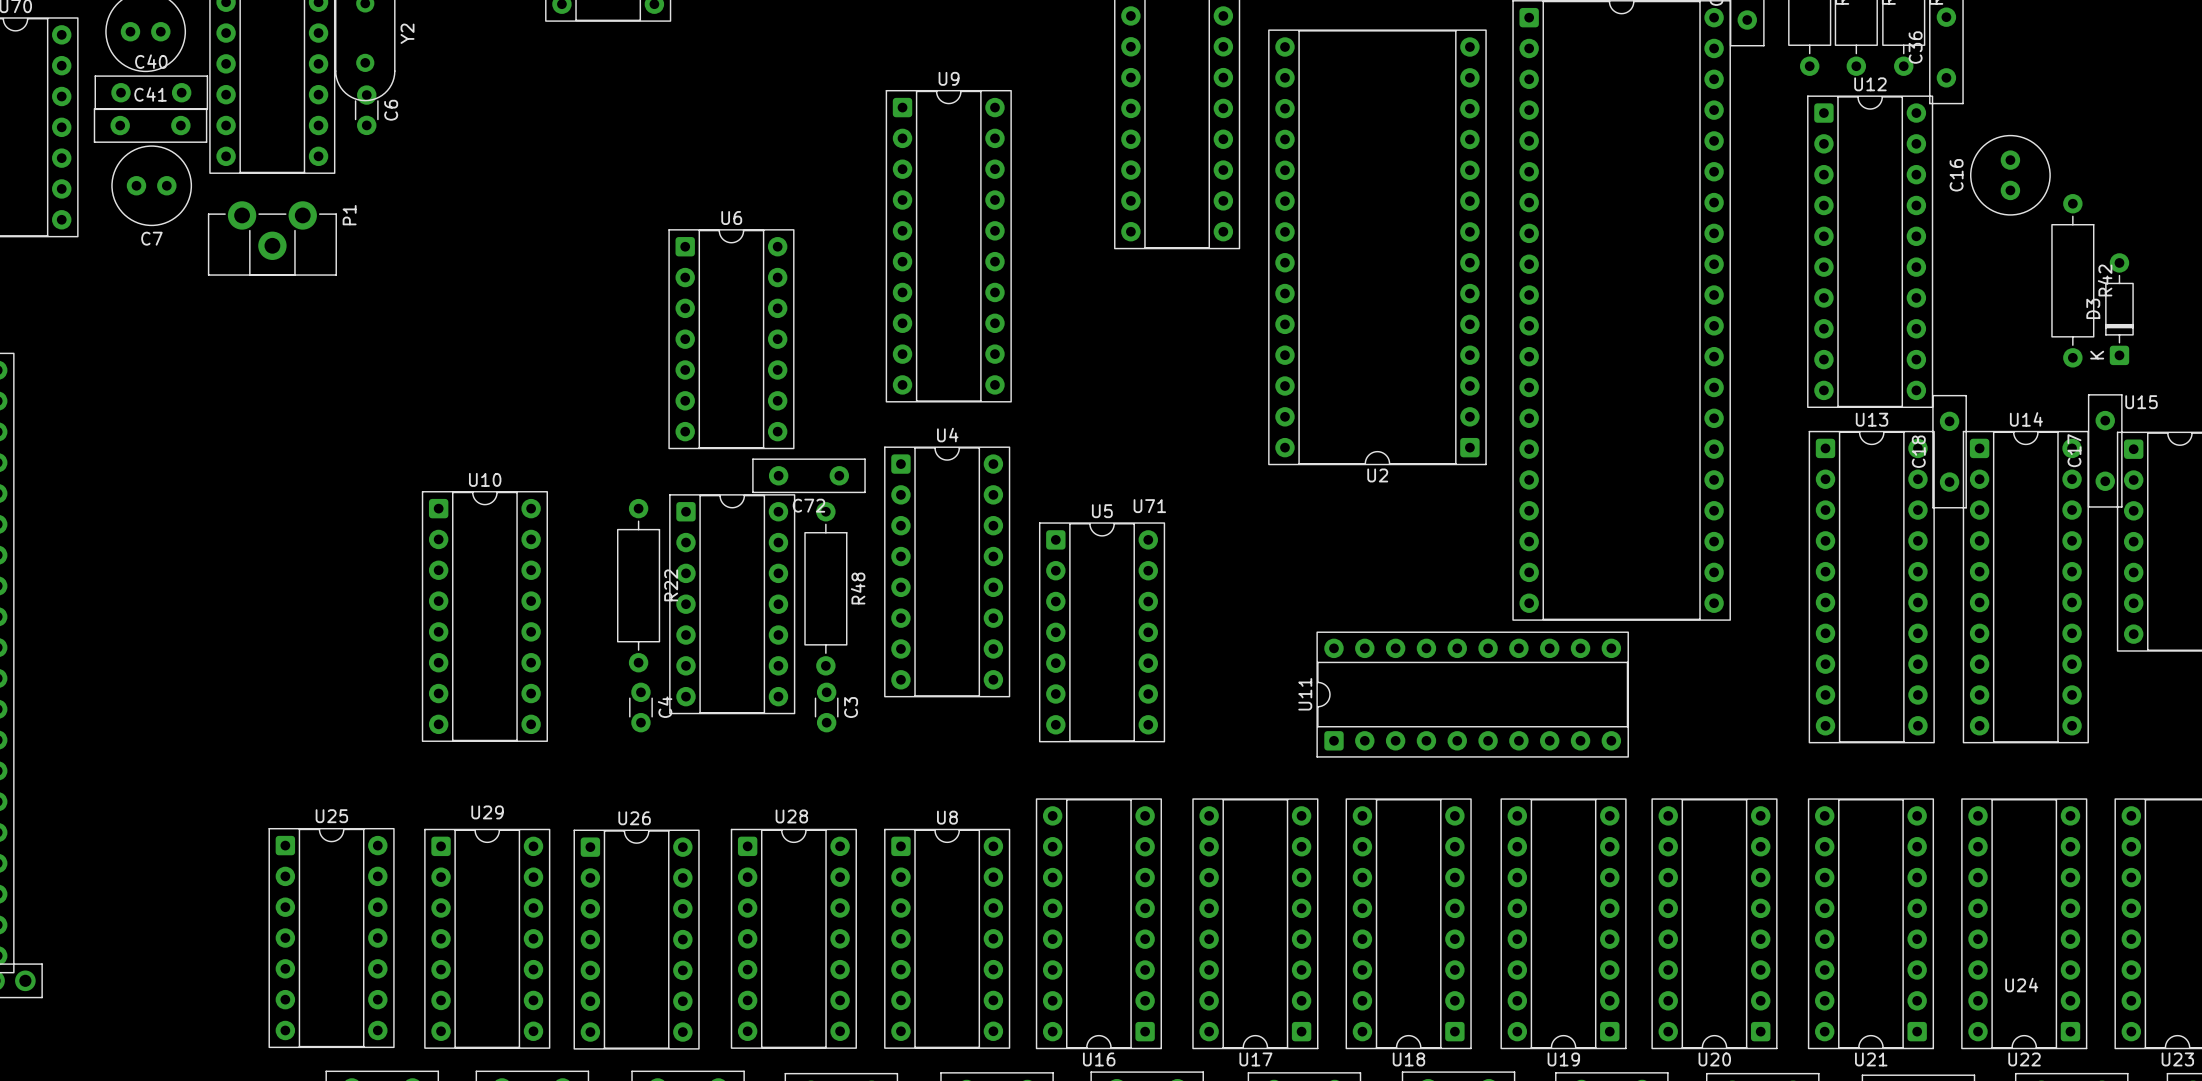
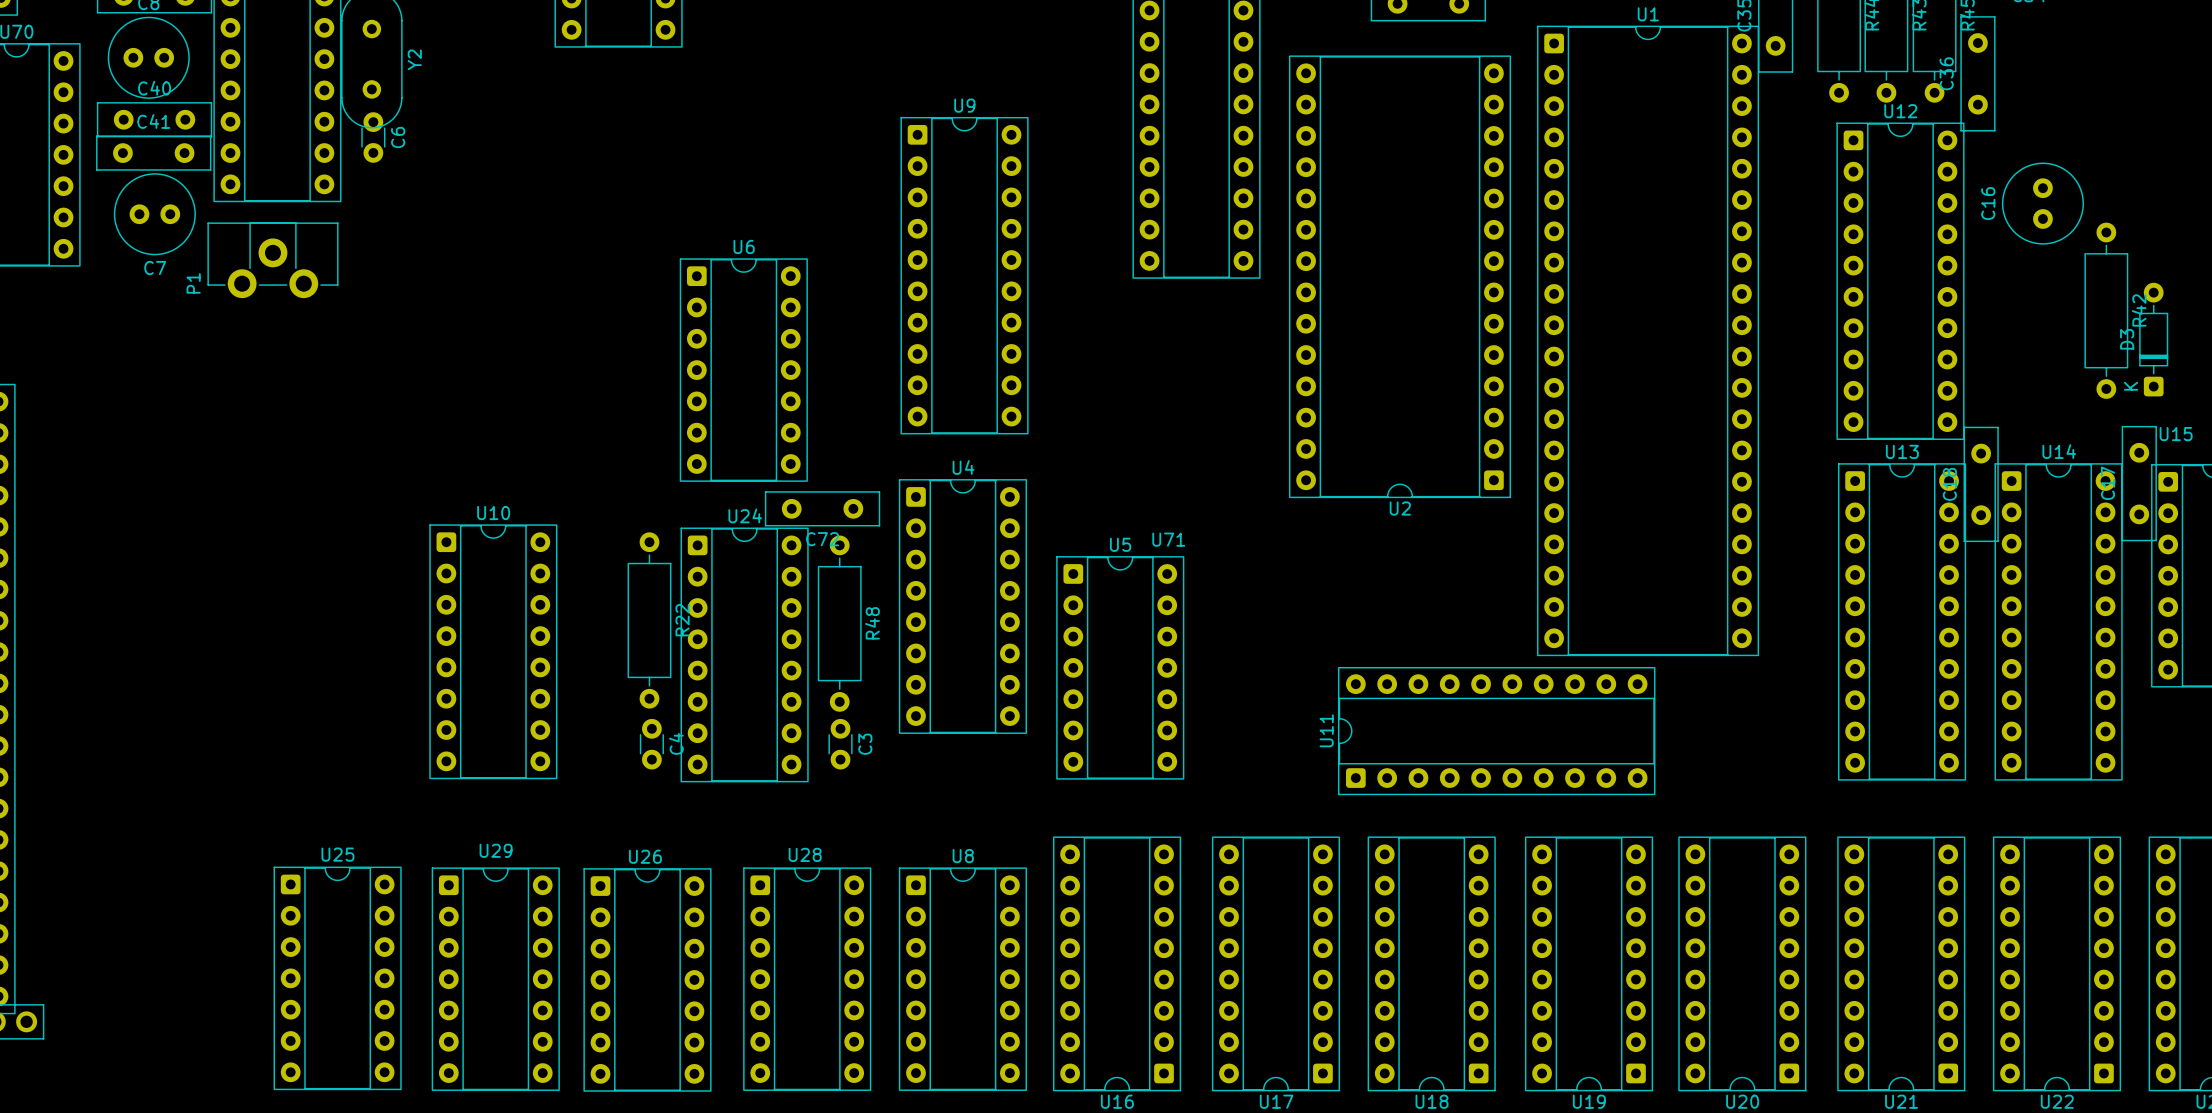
P1 rotation: 0° (272, 238) -> 180° (272, 260)
U24 footprint: [669, 494, 796, 715] -> [680, 527, 809, 783]
U24 name position: U24 (2021, 985) -> U24 (745, 515)

